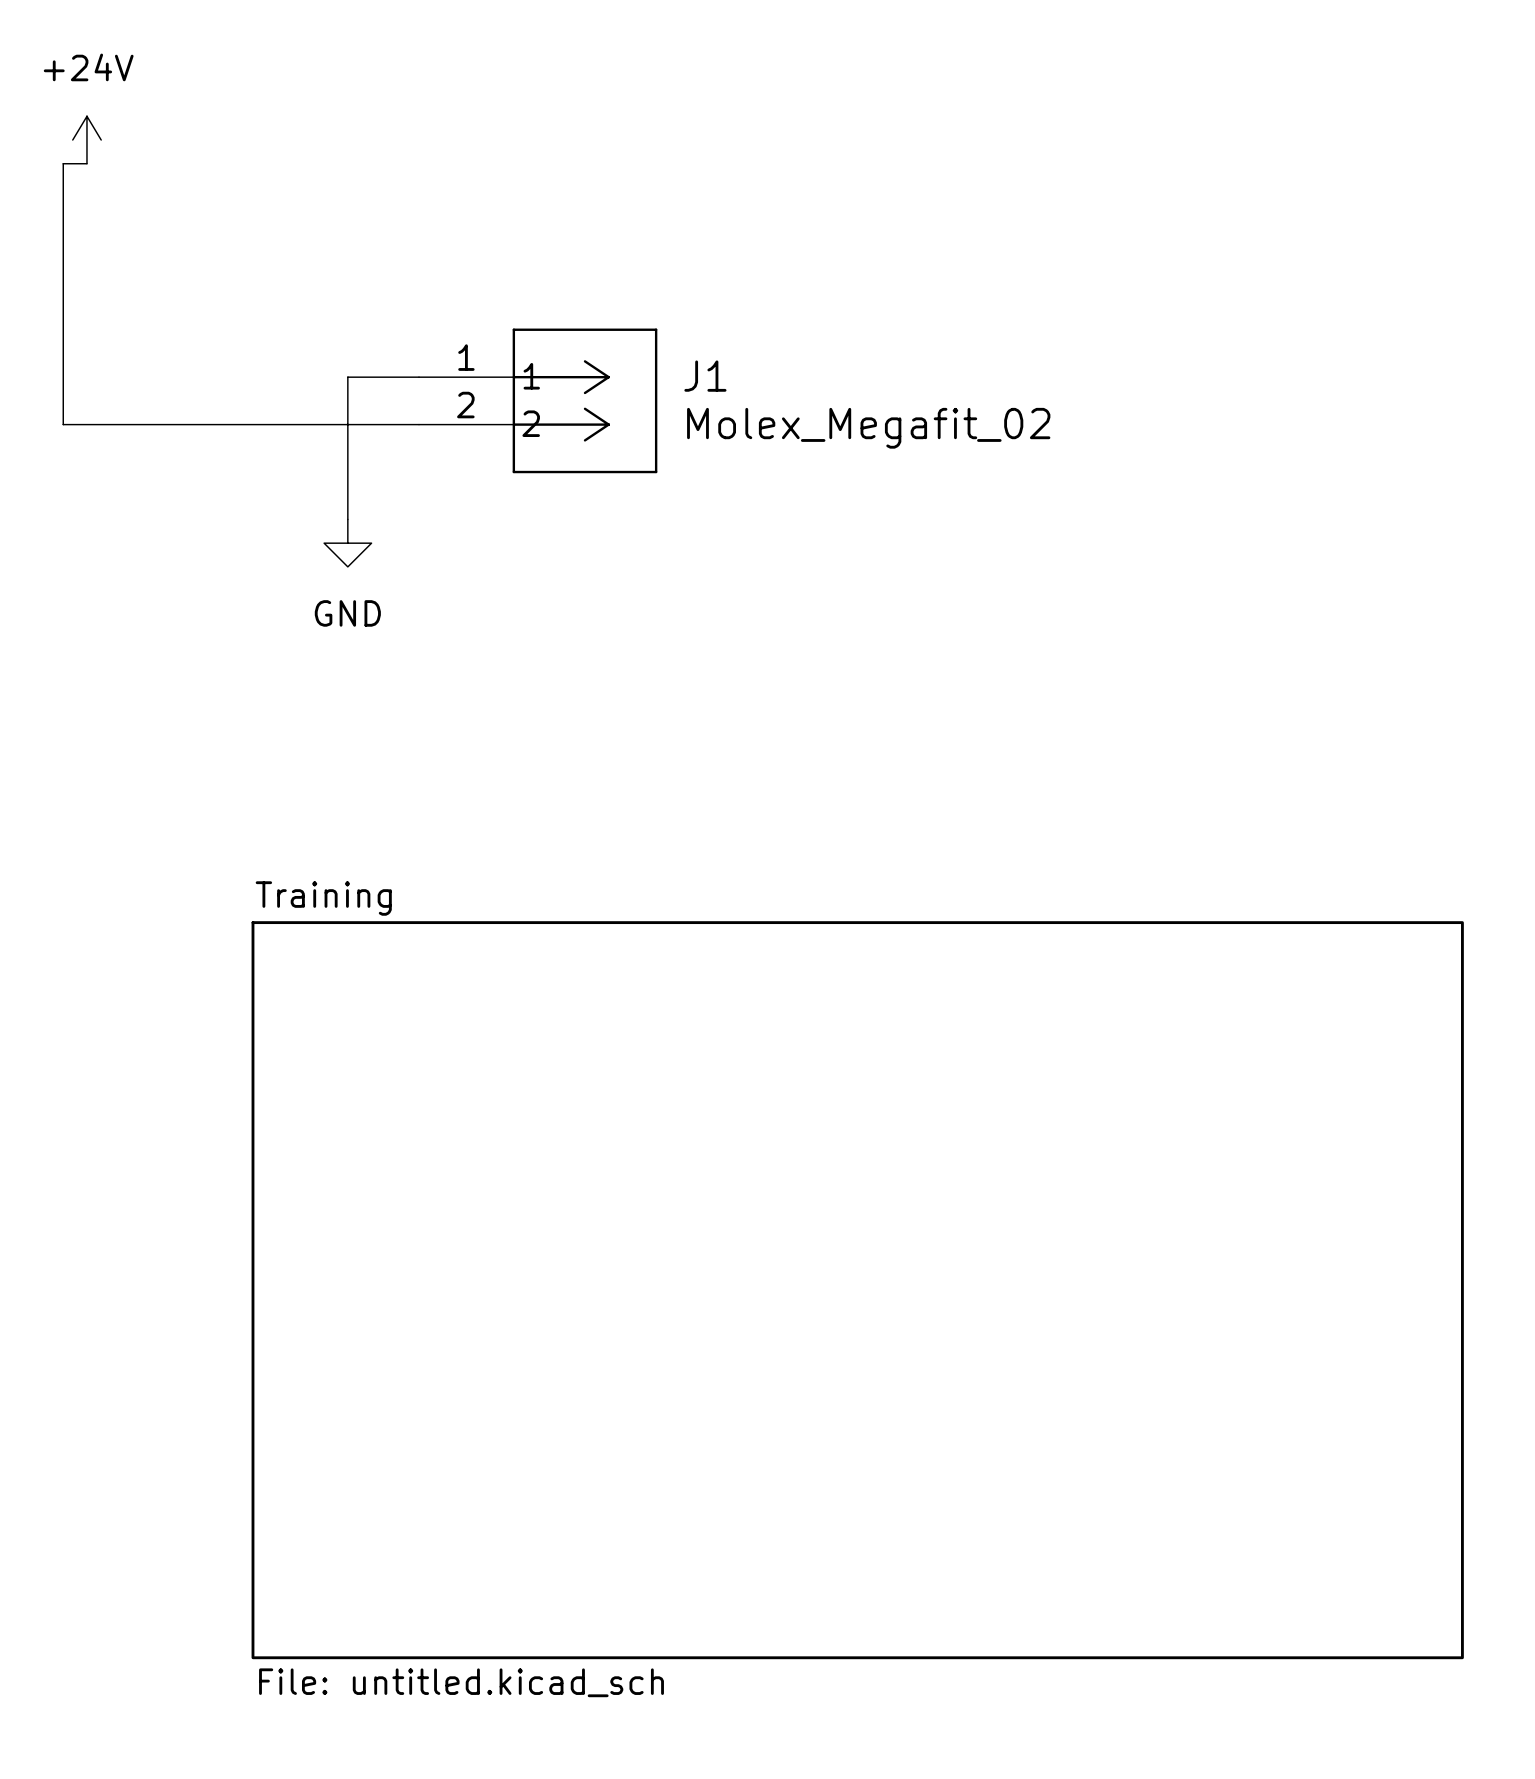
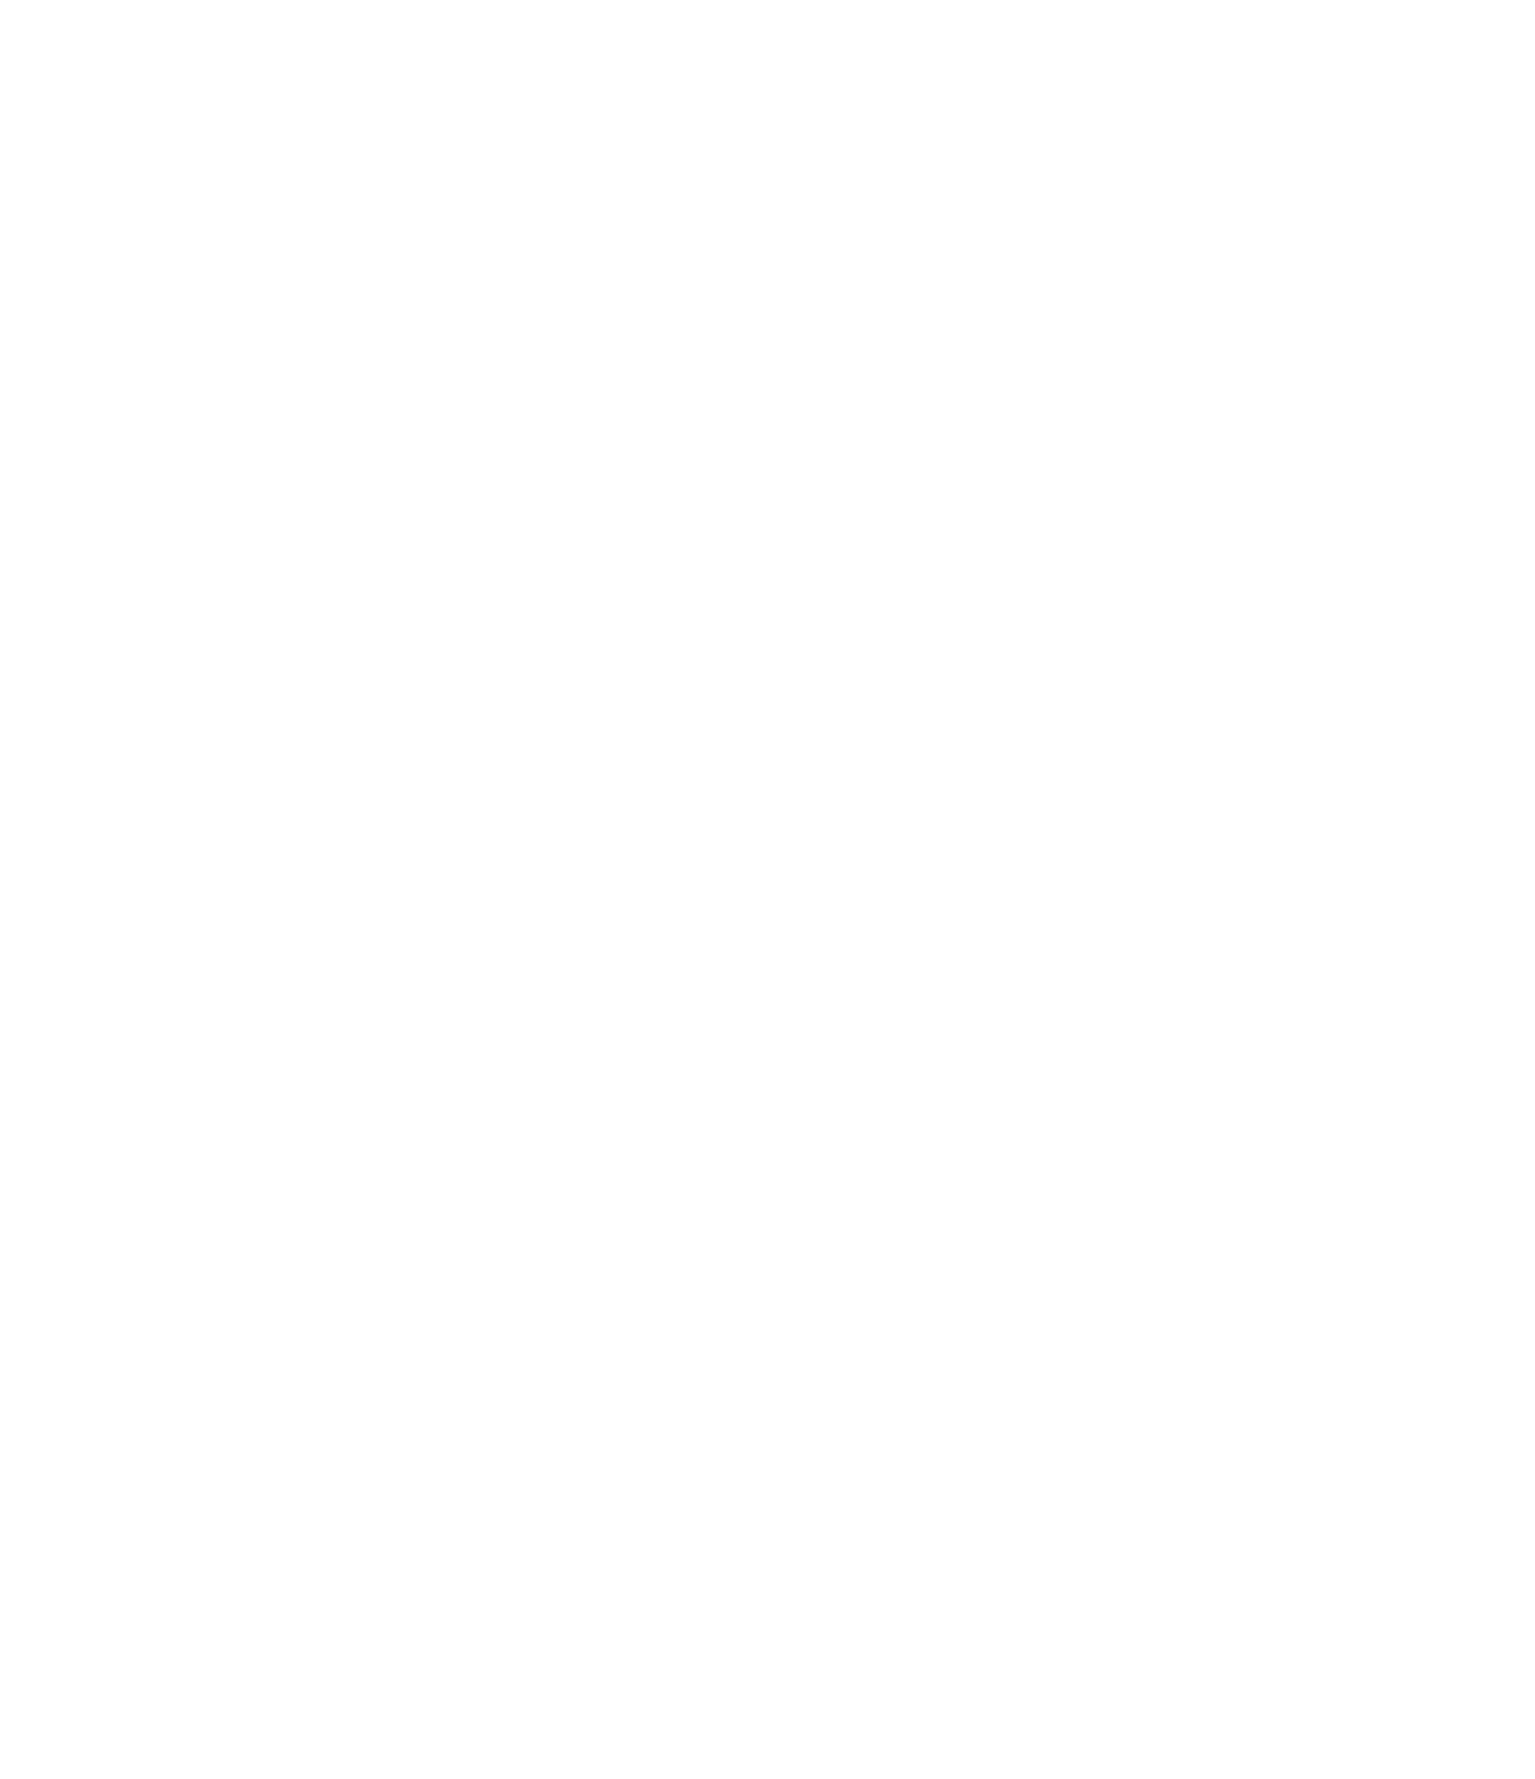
power symbol: +24V (86, 140) -> none
wire: (86, 163) (63, 163) (63, 424) (418, 424) -> none
wire: (418, 377) (347, 377) (347, 519) -> none
J1: Molex_Megafit_02 (538, 400) -> none
power symbol: GND (347, 543) -> none
sheet Training: File: untitled.kicad_sch (857, 1290) -> none

